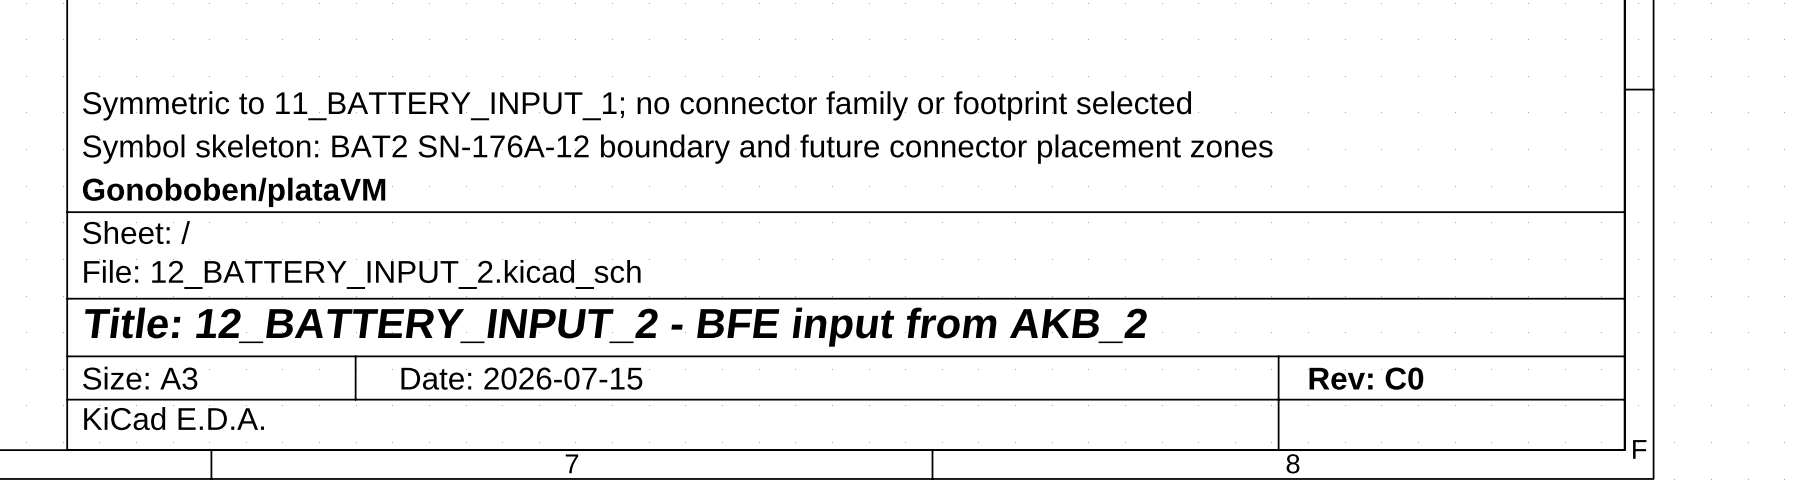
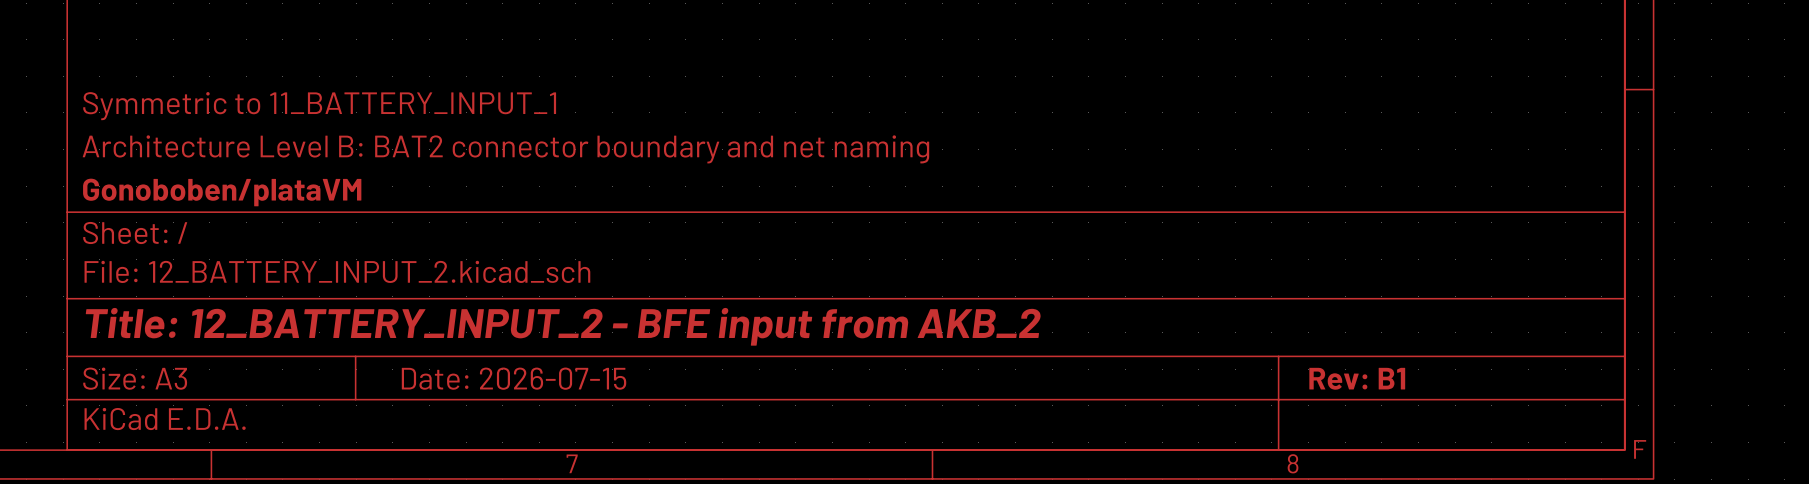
title block: Symmetric to 11_BATTERY_INPUT_1; no connector family or footprint selected (637, 105) -> Symmetric to 11_BATTERY_INPUT_1 (319, 106)
title block: Symbol skeleton: BAT2 SN-176A-12 boundary and future connector placement zones (677, 149) -> Architecture Level B: BAT2 connector boundary and net naming (505, 149)
title block: Rev: C0 (1366, 378) -> Rev: B1 (1357, 378)

